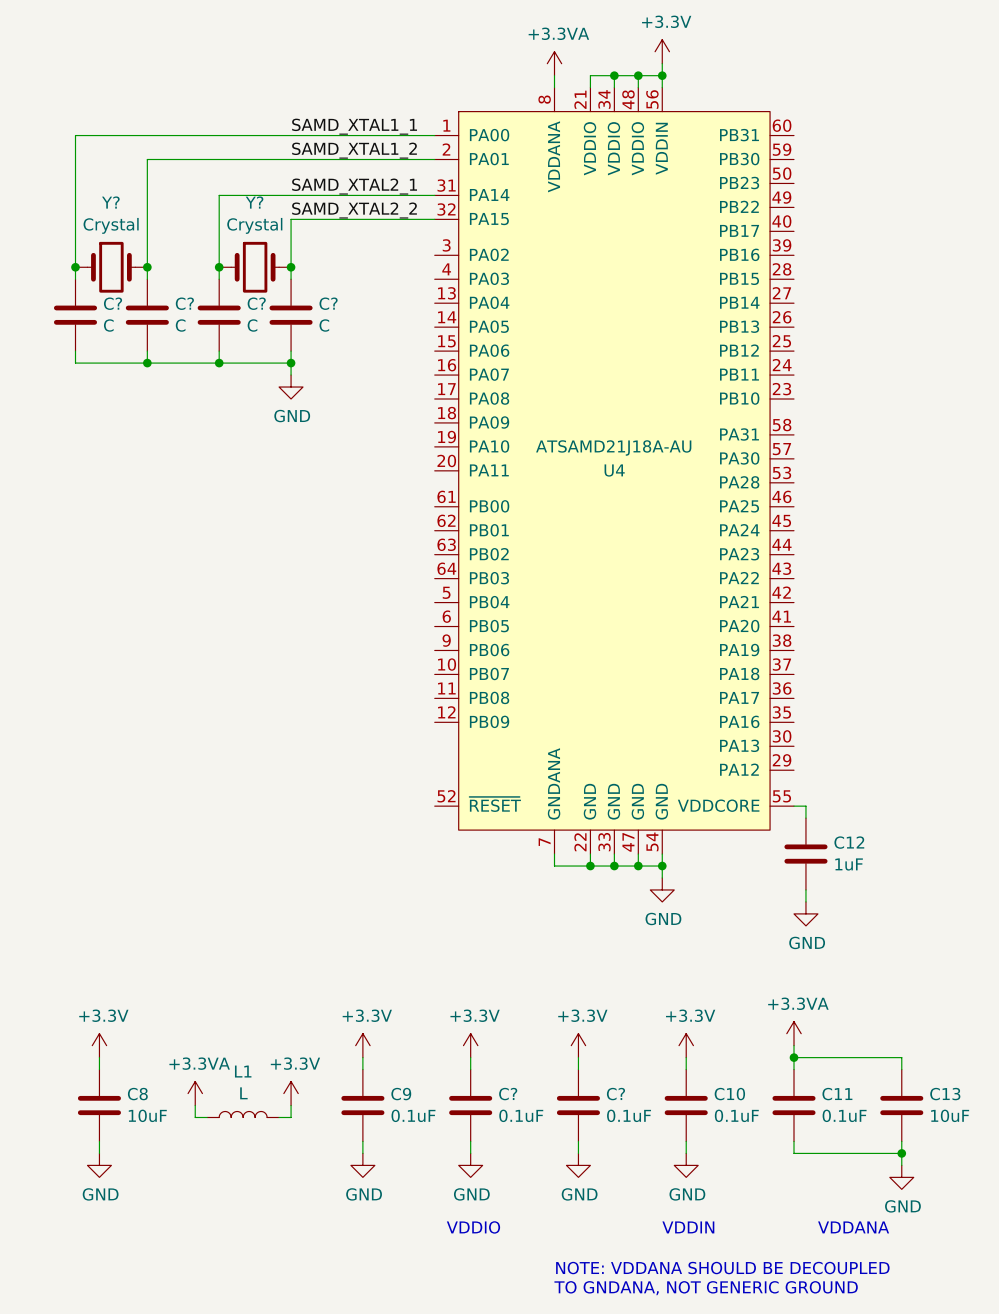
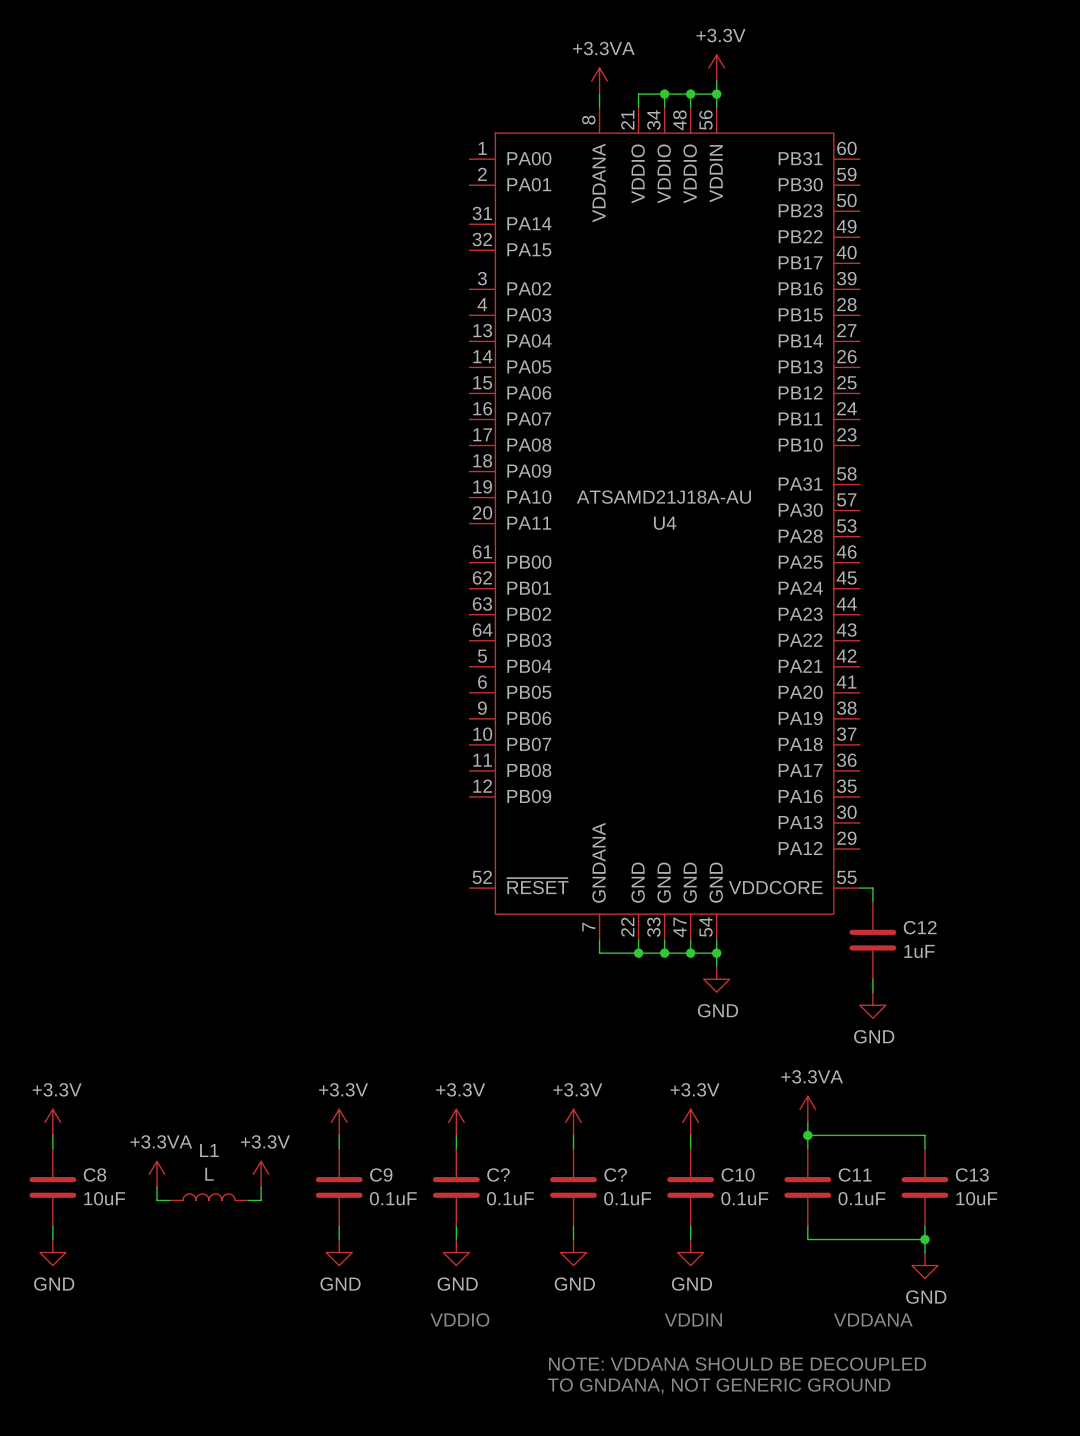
label: SAMD_XTAL1_1 (354, 126) -> none
wire: (434, 135) (75, 135) (75, 279) -> none
label: SAMD_XTAL1_2 (354, 150) -> none
wire: (434, 159) (147, 159) (147, 279) -> none
label: SAMD_XTAL2_1 (354, 186) -> none
wire: (434, 195) (219, 195) (219, 279) -> none
label: SAMD_XTAL2_2 (354, 210) -> none
wire: (434, 219) (291, 219) (291, 279) -> none
junction: (75, 267) -> none
Y?: Crystal (111, 267) -> none
junction: (147, 267) -> none
junction: (219, 267) -> none
Y?: Crystal (255, 267) -> none
junction: (291, 267) -> none
C?: C (75, 315) -> none
C?: C (147, 315) -> none
C?: C (219, 315) -> none
C?: C (291, 315) -> none
wire: (75, 351) (75, 363) (291, 363) -> none
wire: (147, 351) (147, 363) -> none
wire: (219, 351) (219, 363) -> none
wire: (291, 351) (291, 375) -> none
junction: (147, 363) -> none
junction: (219, 363) -> none
junction: (291, 363) -> none
power symbol: GND (291, 387) -> none
power symbol: none -> +3.3V (339, 1122)
power symbol: none -> +3.3V (456, 1122)
power symbol: none -> +3.3V (573, 1122)
power symbol: none -> +3.3V (690, 1122)
junction: none -> (807, 1135)
power symbol position: +3.3VA (793, 1033) -> +3.3VA (807, 1109)
power symbol position: +3.3V (99, 1045) -> +3.3V (52, 1122)
power symbol: +3.3V (362, 1045) -> none
power symbol: +3.3V (470, 1045) -> none
power symbol: +3.3V (578, 1045) -> none
power symbol: +3.3V (686, 1045) -> none
wire: (793, 1045) (793, 1069) -> (807, 1122) (807, 1148)
wire: (99, 1057) (99, 1069) -> (52, 1135) (52, 1148)
wire: (362, 1057) (362, 1069) -> (339, 1135) (339, 1148)
wire: (470, 1057) (470, 1069) -> (456, 1135) (456, 1148)
wire: (578, 1057) (578, 1069) -> (573, 1135) (573, 1148)
wire: (686, 1057) (686, 1069) -> (690, 1135) (690, 1148)
wire: (793, 1057) (901, 1057) (901, 1069) -> (807, 1135) (924, 1135) (924, 1148)
junction: (793, 1057) -> none
power symbol: none -> +3.3V (261, 1174)
C?: none -> 0.1uF (456, 1187)
C?: none -> 0.1uF (573, 1187)
power symbol position: +3.3VA (195, 1093) -> +3.3VA (156, 1174)
power symbol: +3.3V (291, 1093) -> none
C8 position: (99, 1105) -> (52, 1187)
wire: (195, 1105) (195, 1117) (207, 1117) -> (156, 1187) (156, 1200) (170, 1200)
wire: (291, 1105) (291, 1117) (279, 1117) -> (261, 1187) (261, 1200) (248, 1200)
C9 position: (362, 1105) -> (339, 1187)
C?: 0.1uF (470, 1105) -> none
C?: 0.1uF (578, 1105) -> none
C10 position: (686, 1105) -> (690, 1187)
C11 position: (793, 1105) -> (807, 1187)
C13 position: (901, 1105) -> (924, 1187)
L1 position: (243, 1114) -> (209, 1197)
junction: none -> (924, 1239)
wire: (99, 1141) (99, 1153) -> (52, 1226) (52, 1239)
power symbol: none -> GND (339, 1252)
wire: (362, 1141) (362, 1153) -> (339, 1226) (339, 1239)
power symbol: none -> GND (456, 1252)
wire: (470, 1141) (470, 1153) -> (456, 1226) (456, 1239)
power symbol: none -> GND (573, 1252)
wire: (578, 1141) (578, 1153) -> (573, 1226) (573, 1239)
power symbol: none -> GND (690, 1252)
wire: (686, 1141) (686, 1153) -> (690, 1226) (690, 1239)
wire: (793, 1141) (793, 1153) (901, 1153) -> (807, 1226) (807, 1239) (924, 1239)
wire: (901, 1141) (901, 1165) -> (924, 1226) (924, 1252)
junction: (901, 1153) -> none
power symbol position: GND (99, 1165) -> GND (52, 1252)
power symbol: GND (362, 1165) -> none
power symbol: GND (470, 1165) -> none
power symbol: GND (578, 1165) -> none
power symbol: GND (686, 1165) -> none
power symbol position: GND (901, 1177) -> GND (924, 1265)
text position: VDDIO (473, 1227) -> VDDIO (459, 1319)
text position: VDDIN (688, 1227) -> VDDIN (693, 1319)
text position: VDDANA (853, 1227) -> VDDANA (873, 1319)
text position: NOTE: VDDANA SHOULD BE DECOUPLED (722, 1268) -> NOTE: VDDANA SHOULD BE DECOUPLED (737, 1364)
text position: TO GNDANA, NOT GENERIC GROUND (706, 1288) -> TO GNDANA, NOT GENERIC GROUND (719, 1386)

